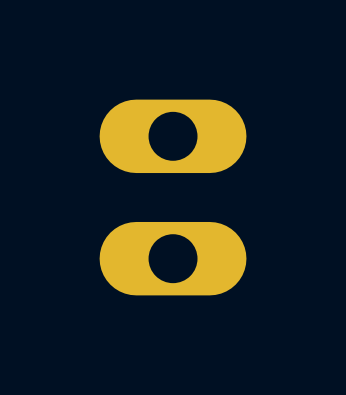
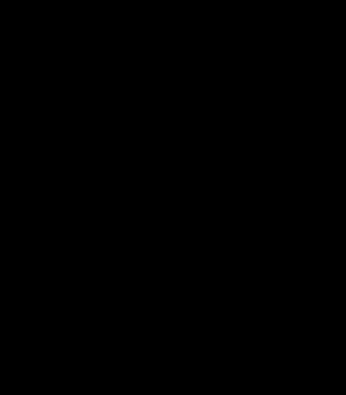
part: (173, 197) -> none

